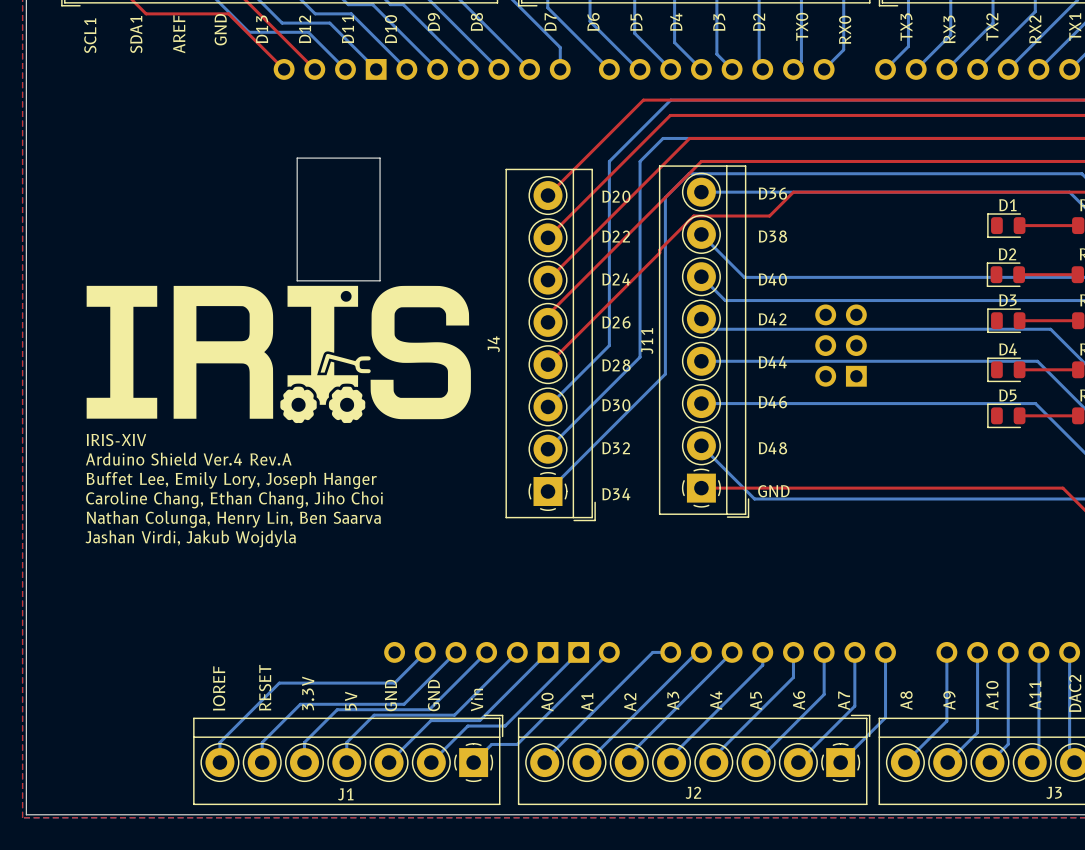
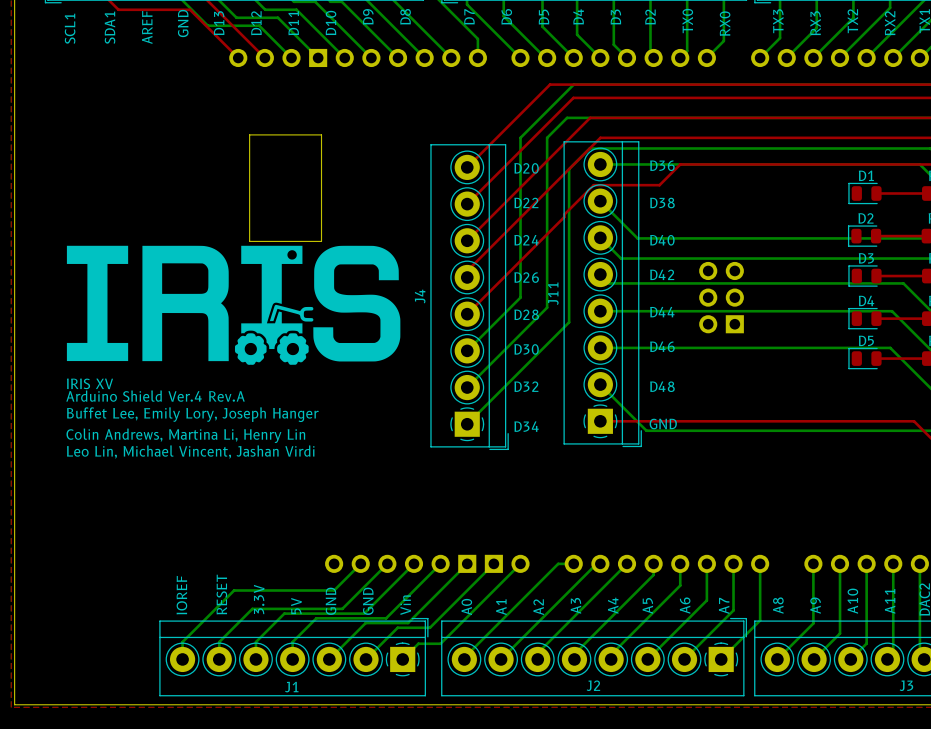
text: IRIS-XIV (116, 440) -> IRIS XV (90, 383)
text: Caroline Chang, Ethan Chang, Jiho Choi (234, 499) -> Colin Andrews, Martina Li, Henry Lin (185, 435)
text: Nathan Colunga, Henry Lin, Ben Saarva (233, 519) -> Leo Lin, Michael Vincent, Jashan Virdi (190, 452)
text: Jashan Virdi, Jakub Wojdyla (190, 538) -> none

